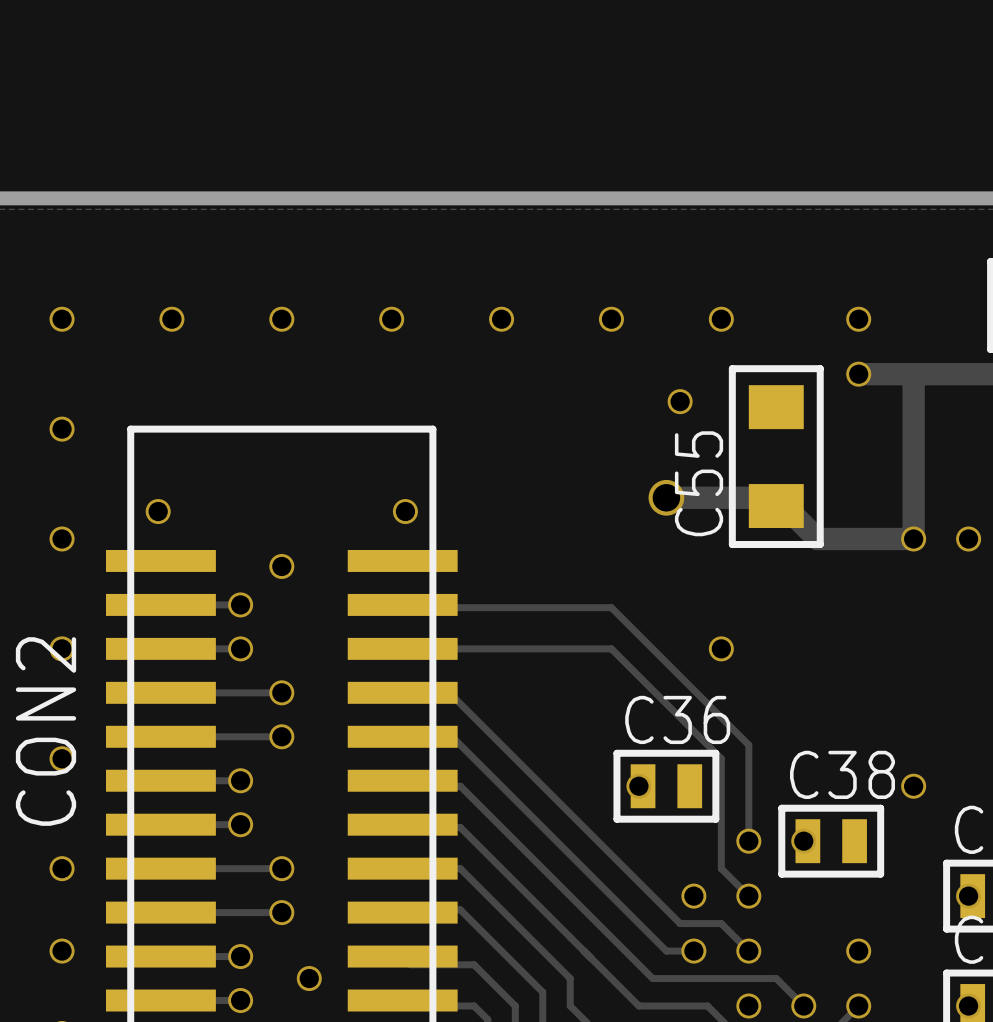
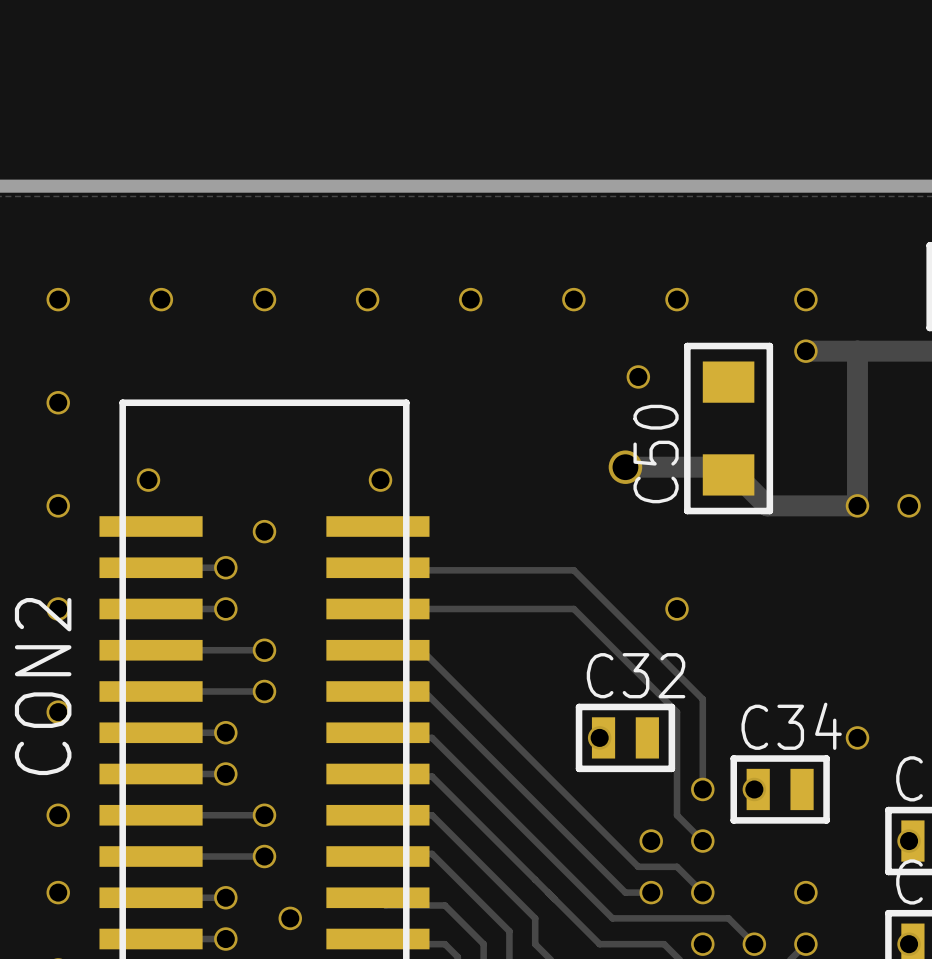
C55 name: C55 (699, 483) -> C50 (656, 454)
C36 name: C36 (677, 719) -> C32 (636, 675)
C38 name: C38 (842, 774) -> C34 (791, 726)

